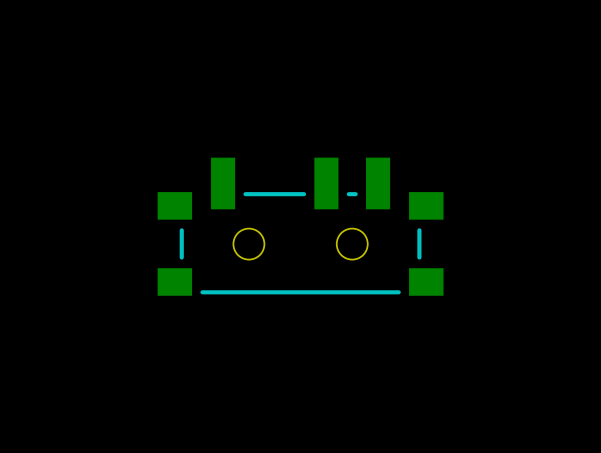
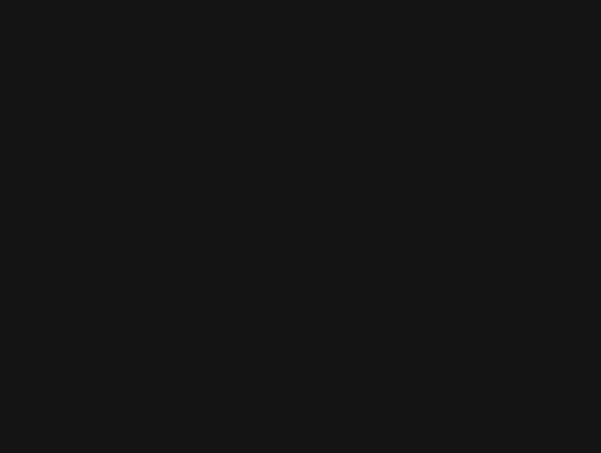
part: (300, 226) -> none

